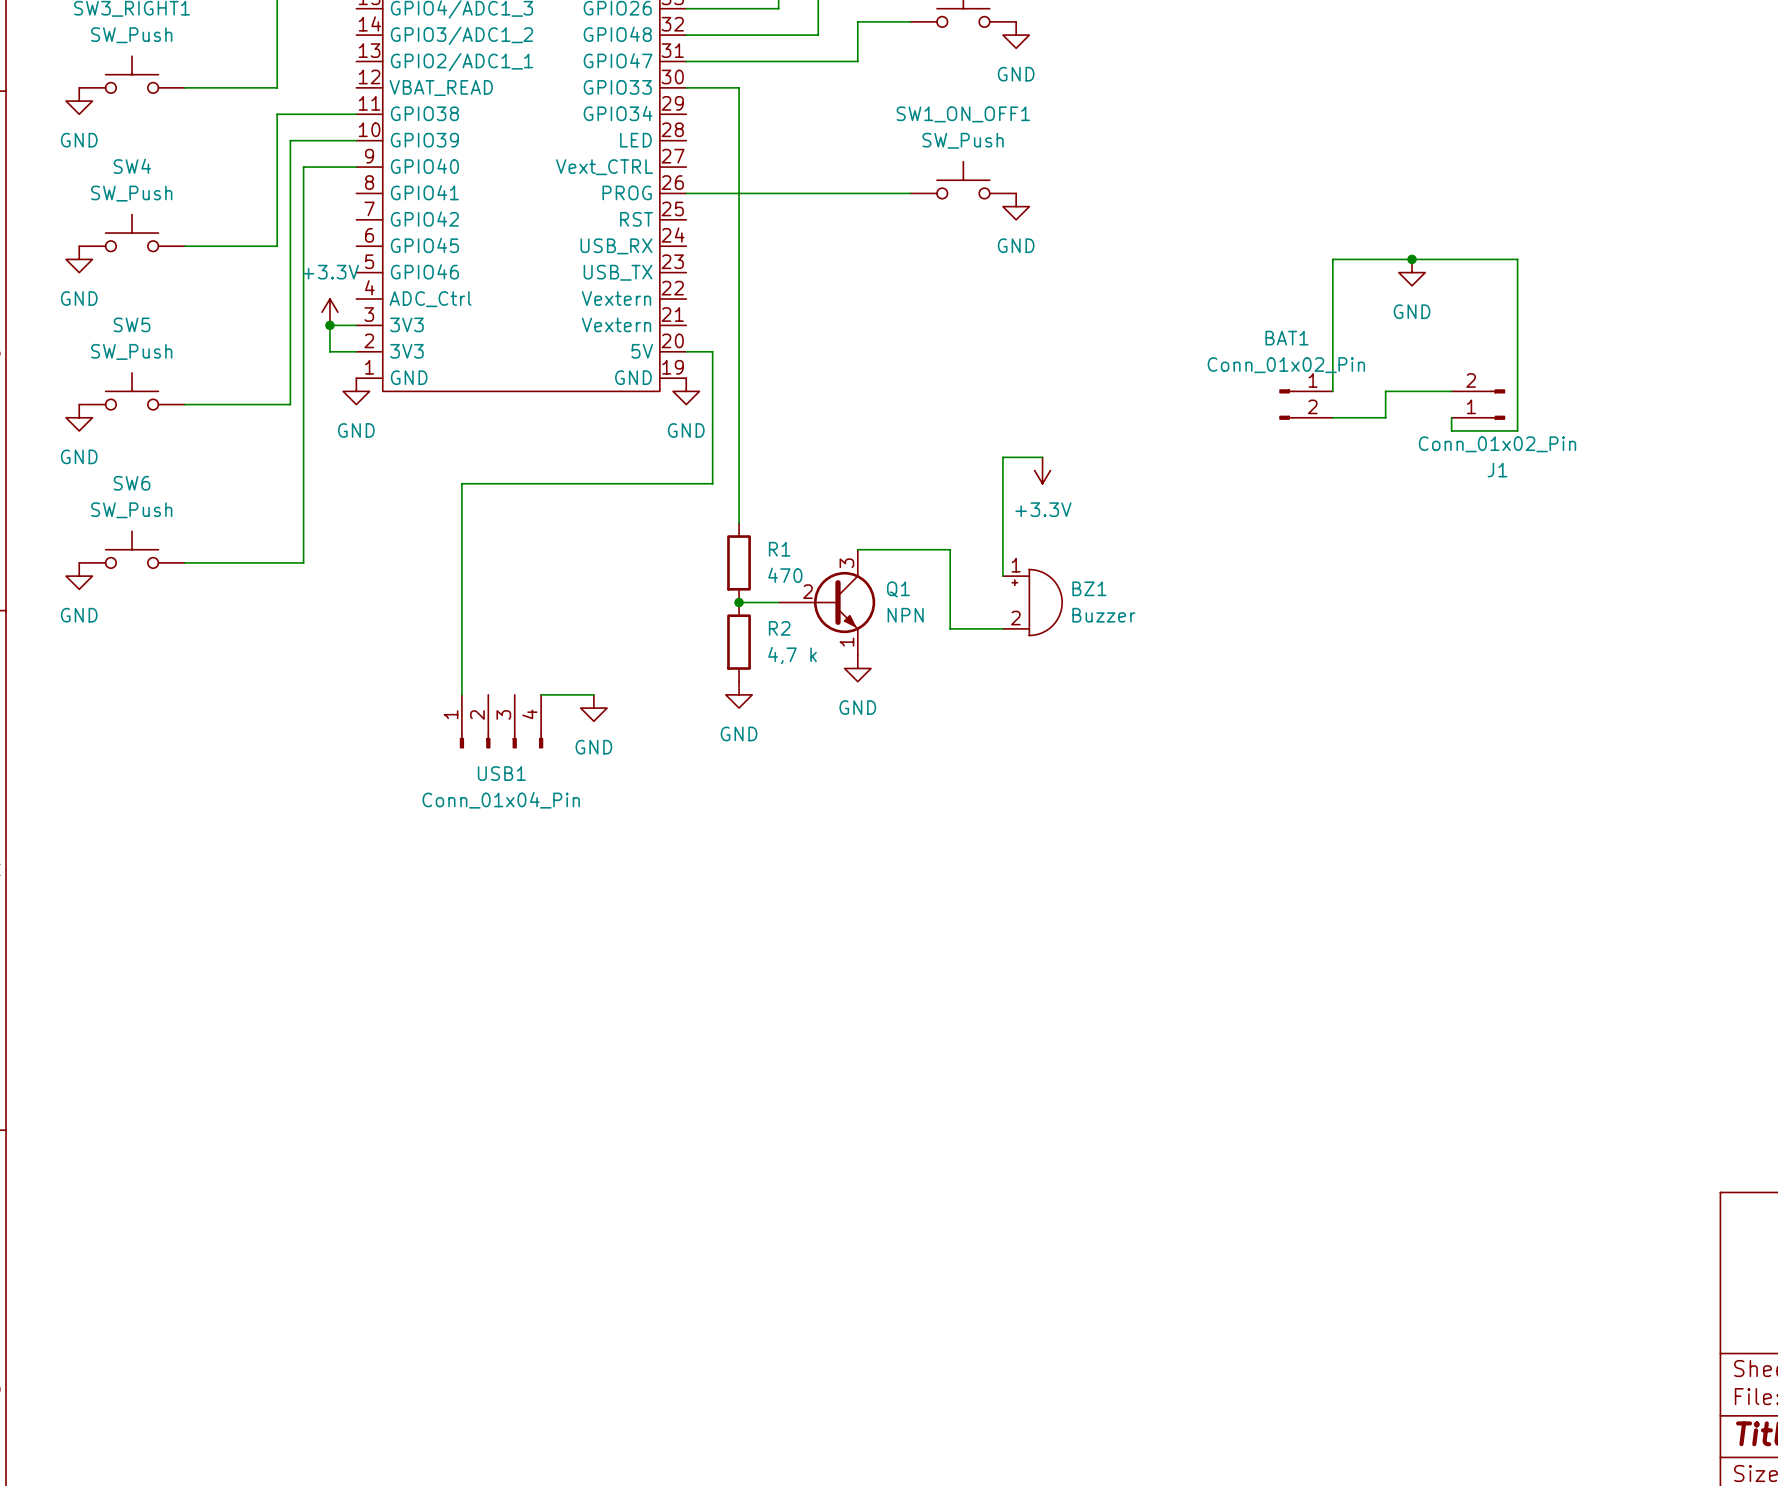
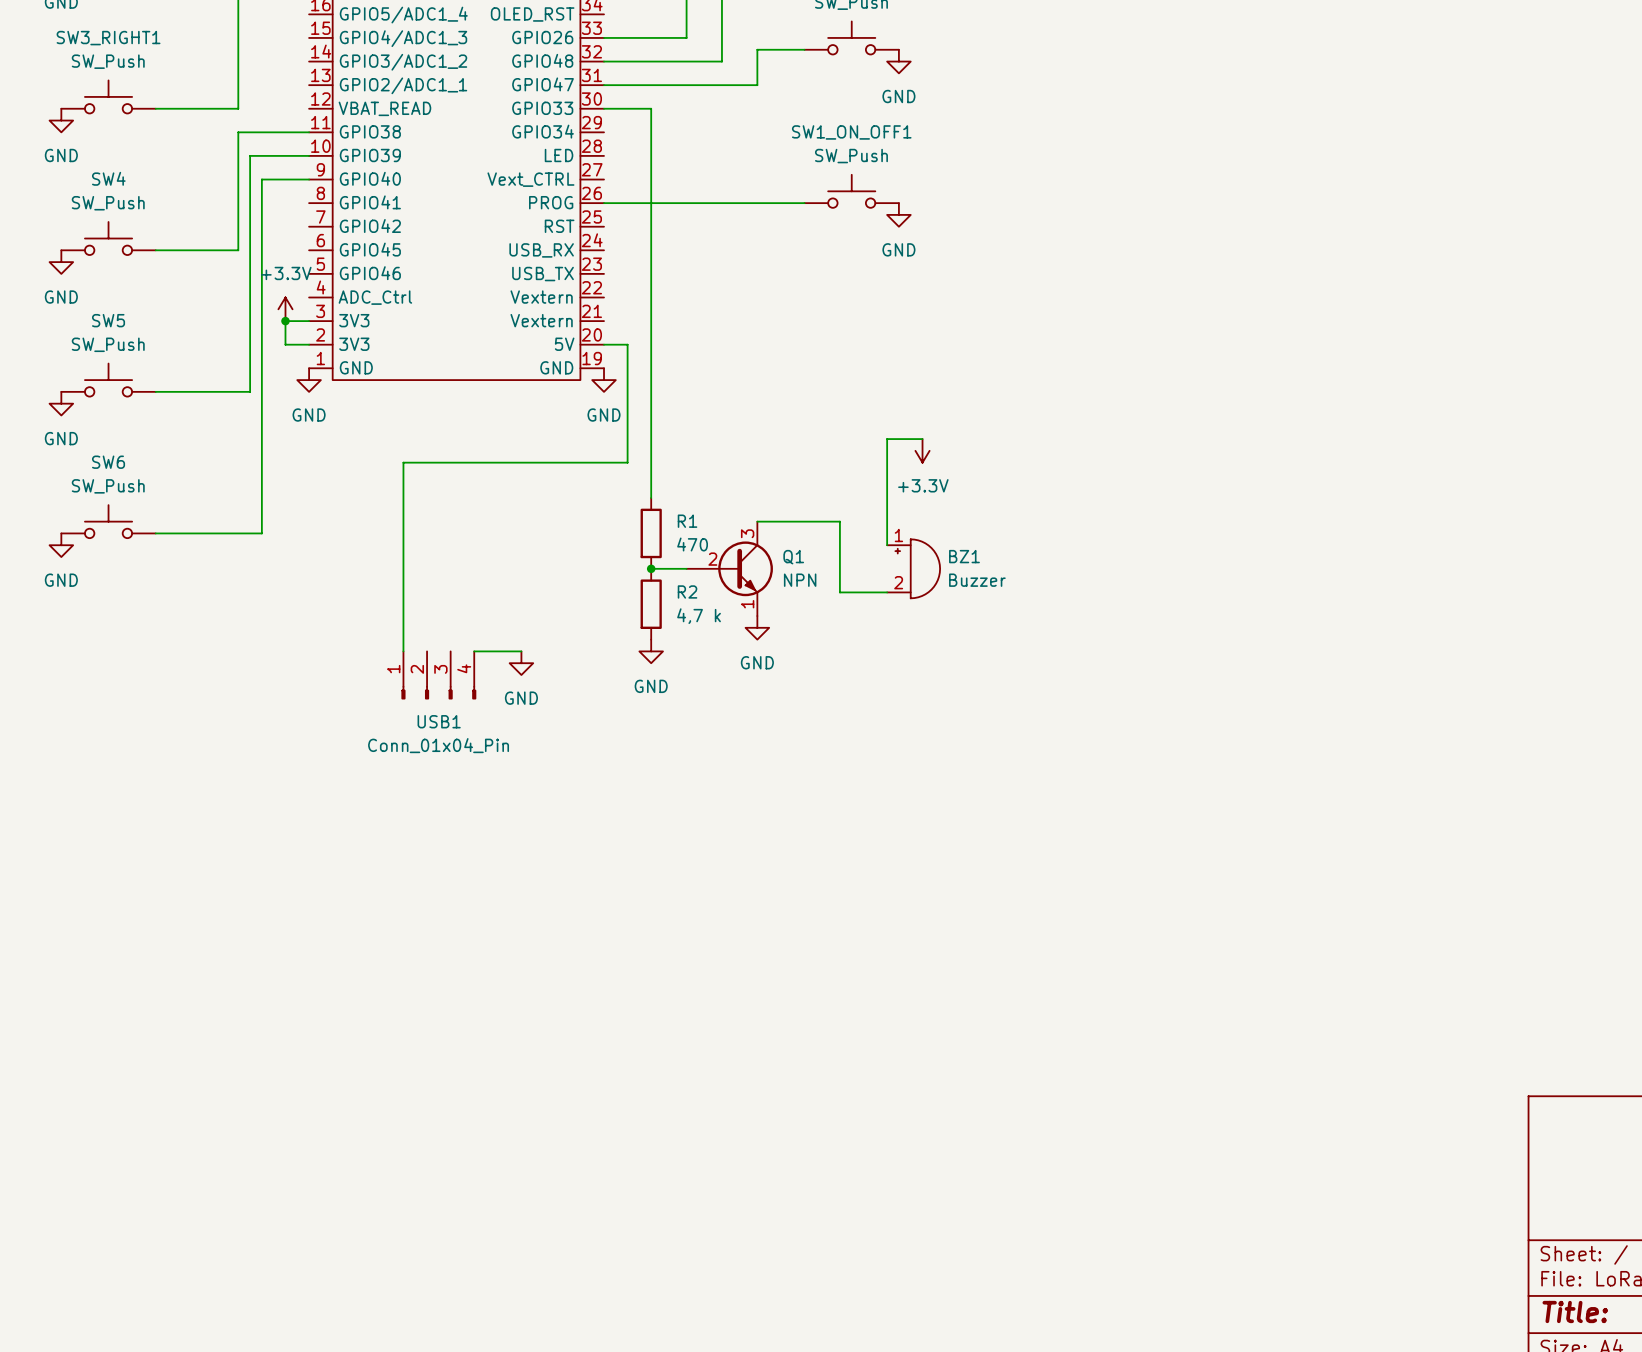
junction: (1412, 259) -> none
power symbol: GND (1412, 272) -> none
wire: (1332, 391) (1332, 259) (1517, 259) (1517, 430) (1451, 430) (1451, 417) -> none
wire: (1451, 391) (1385, 391) (1385, 417) (1332, 417) -> none
BAT1: Conn_01x02_Pin (1306, 404) -> none
J1: Conn_01x02_Pin (1478, 404) -> none

